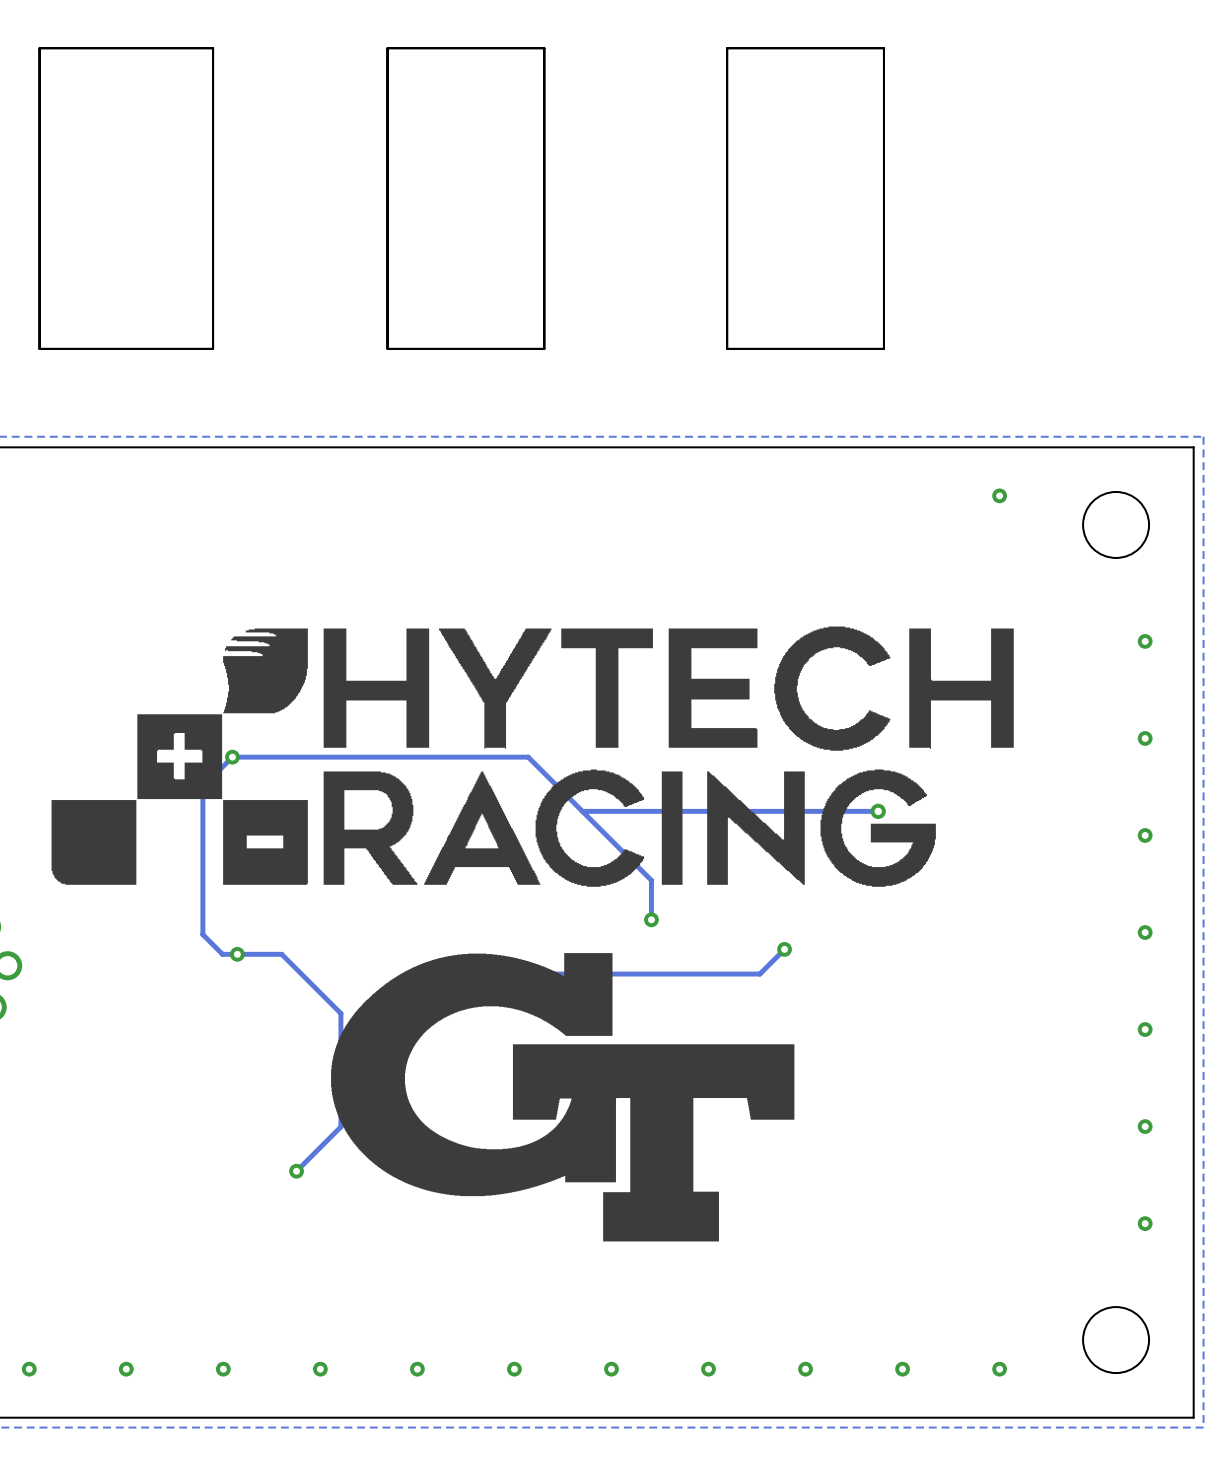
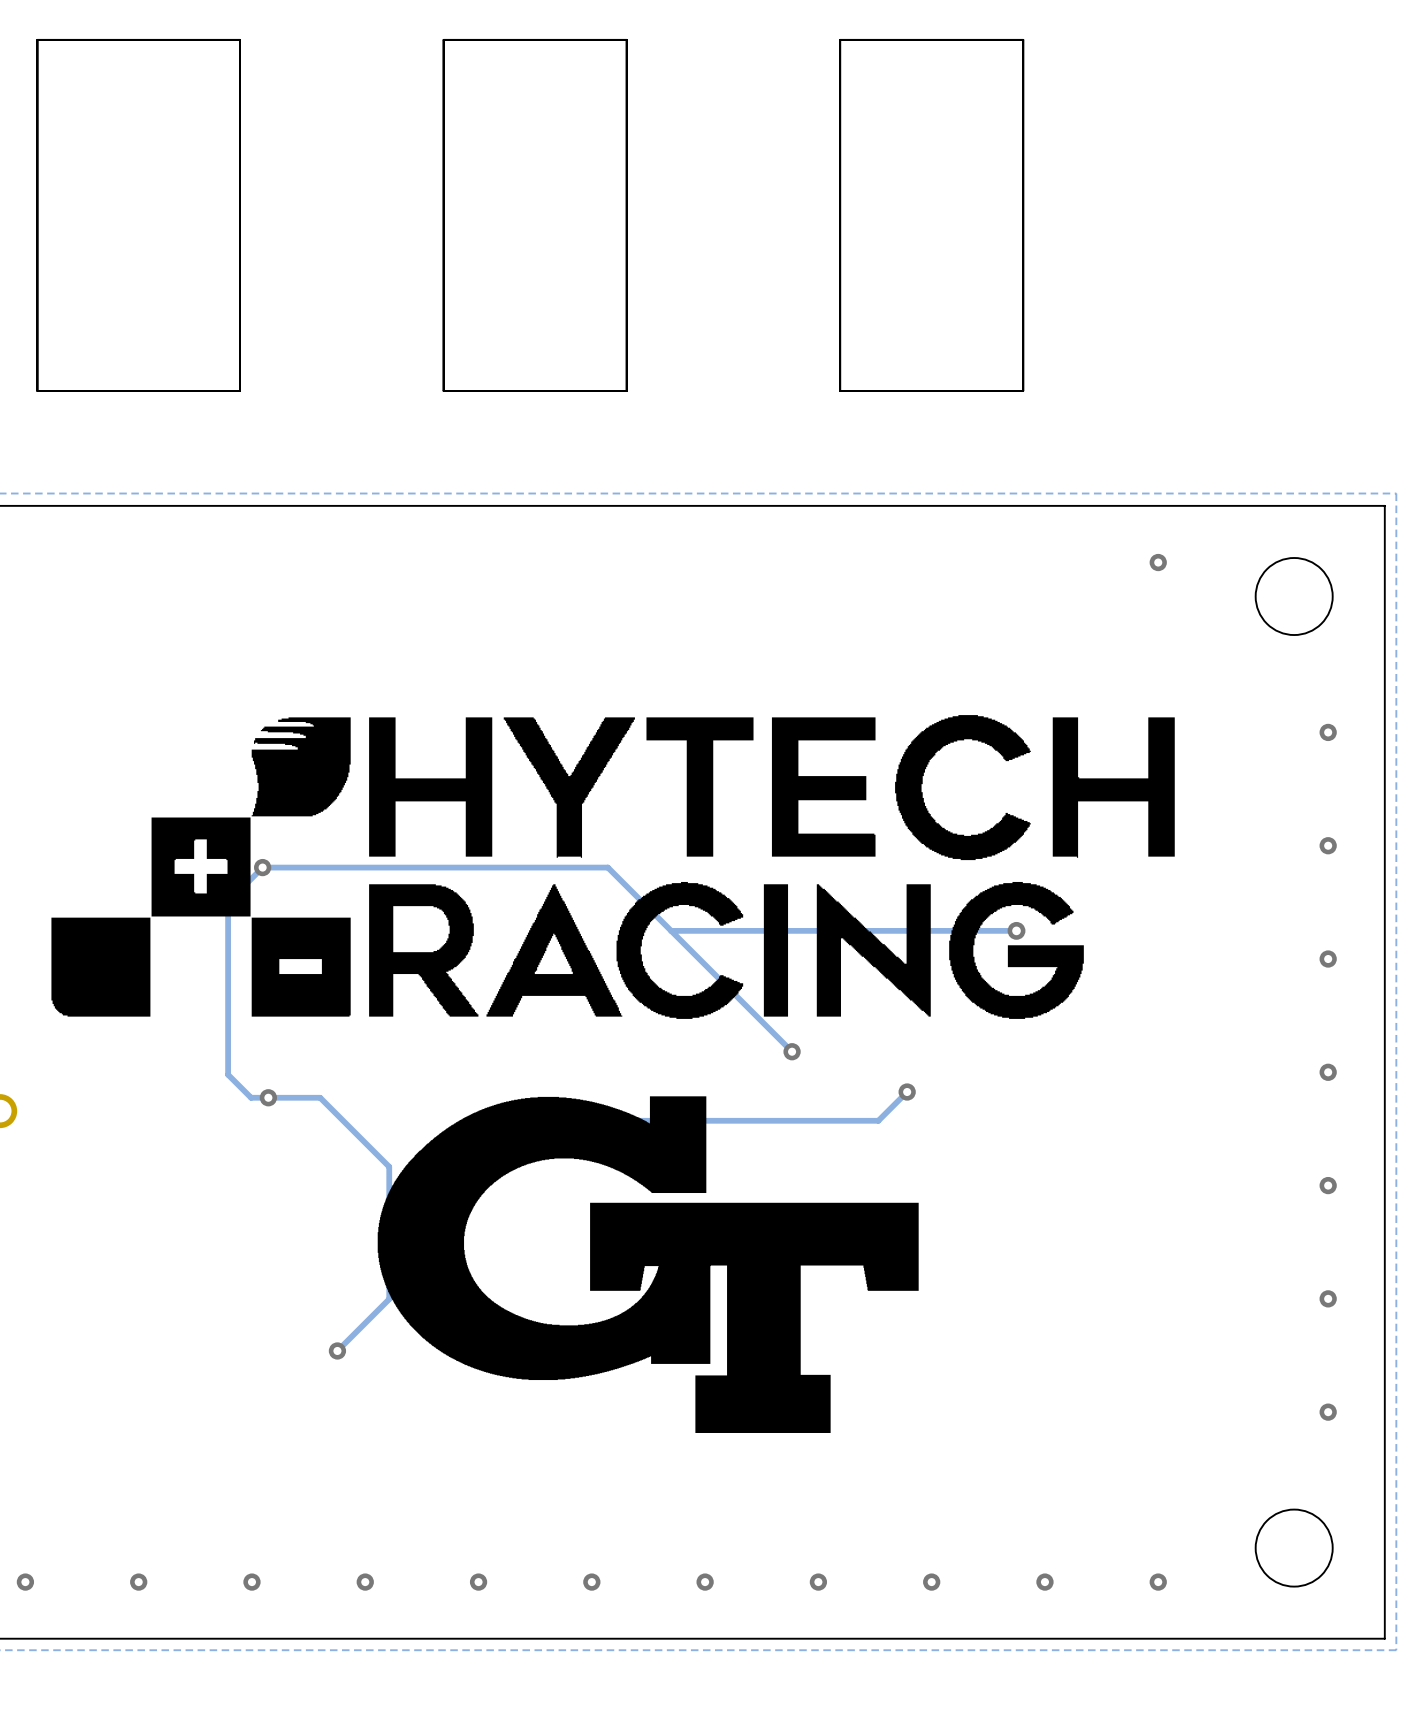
track: (651, 880) (651, 919) -> (751, 1011) (792, 1051)
via position: (651, 919) -> (792, 1051)

